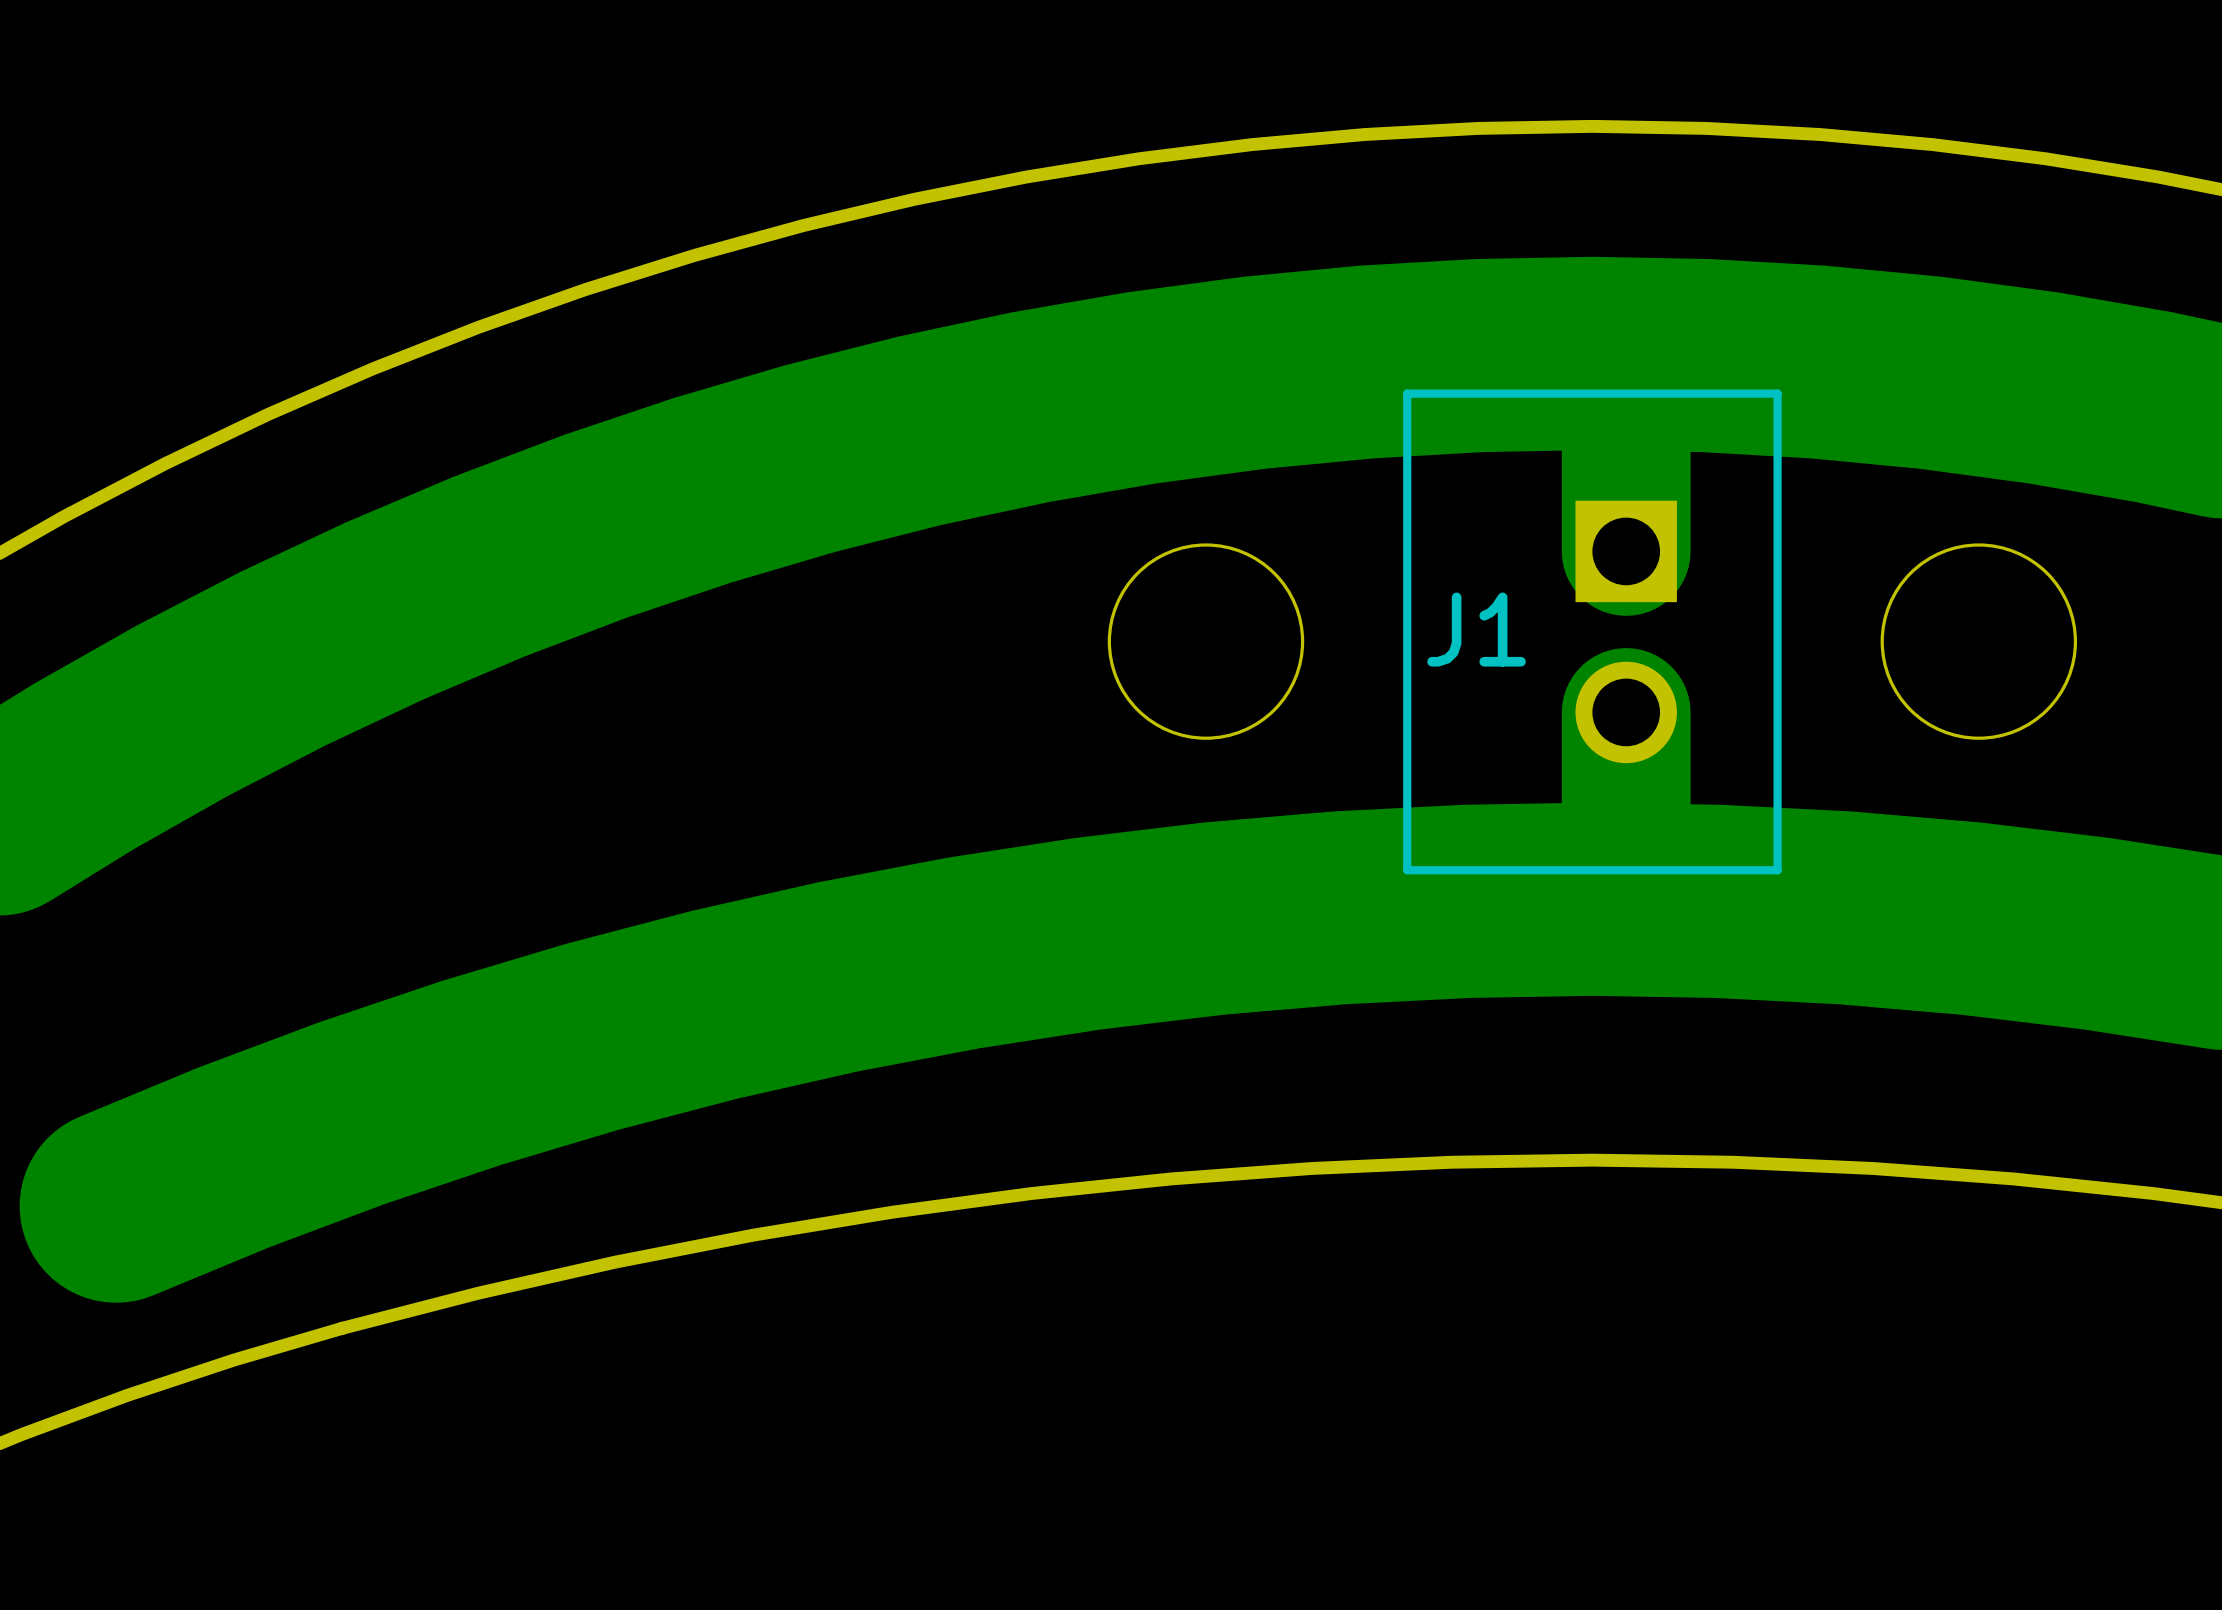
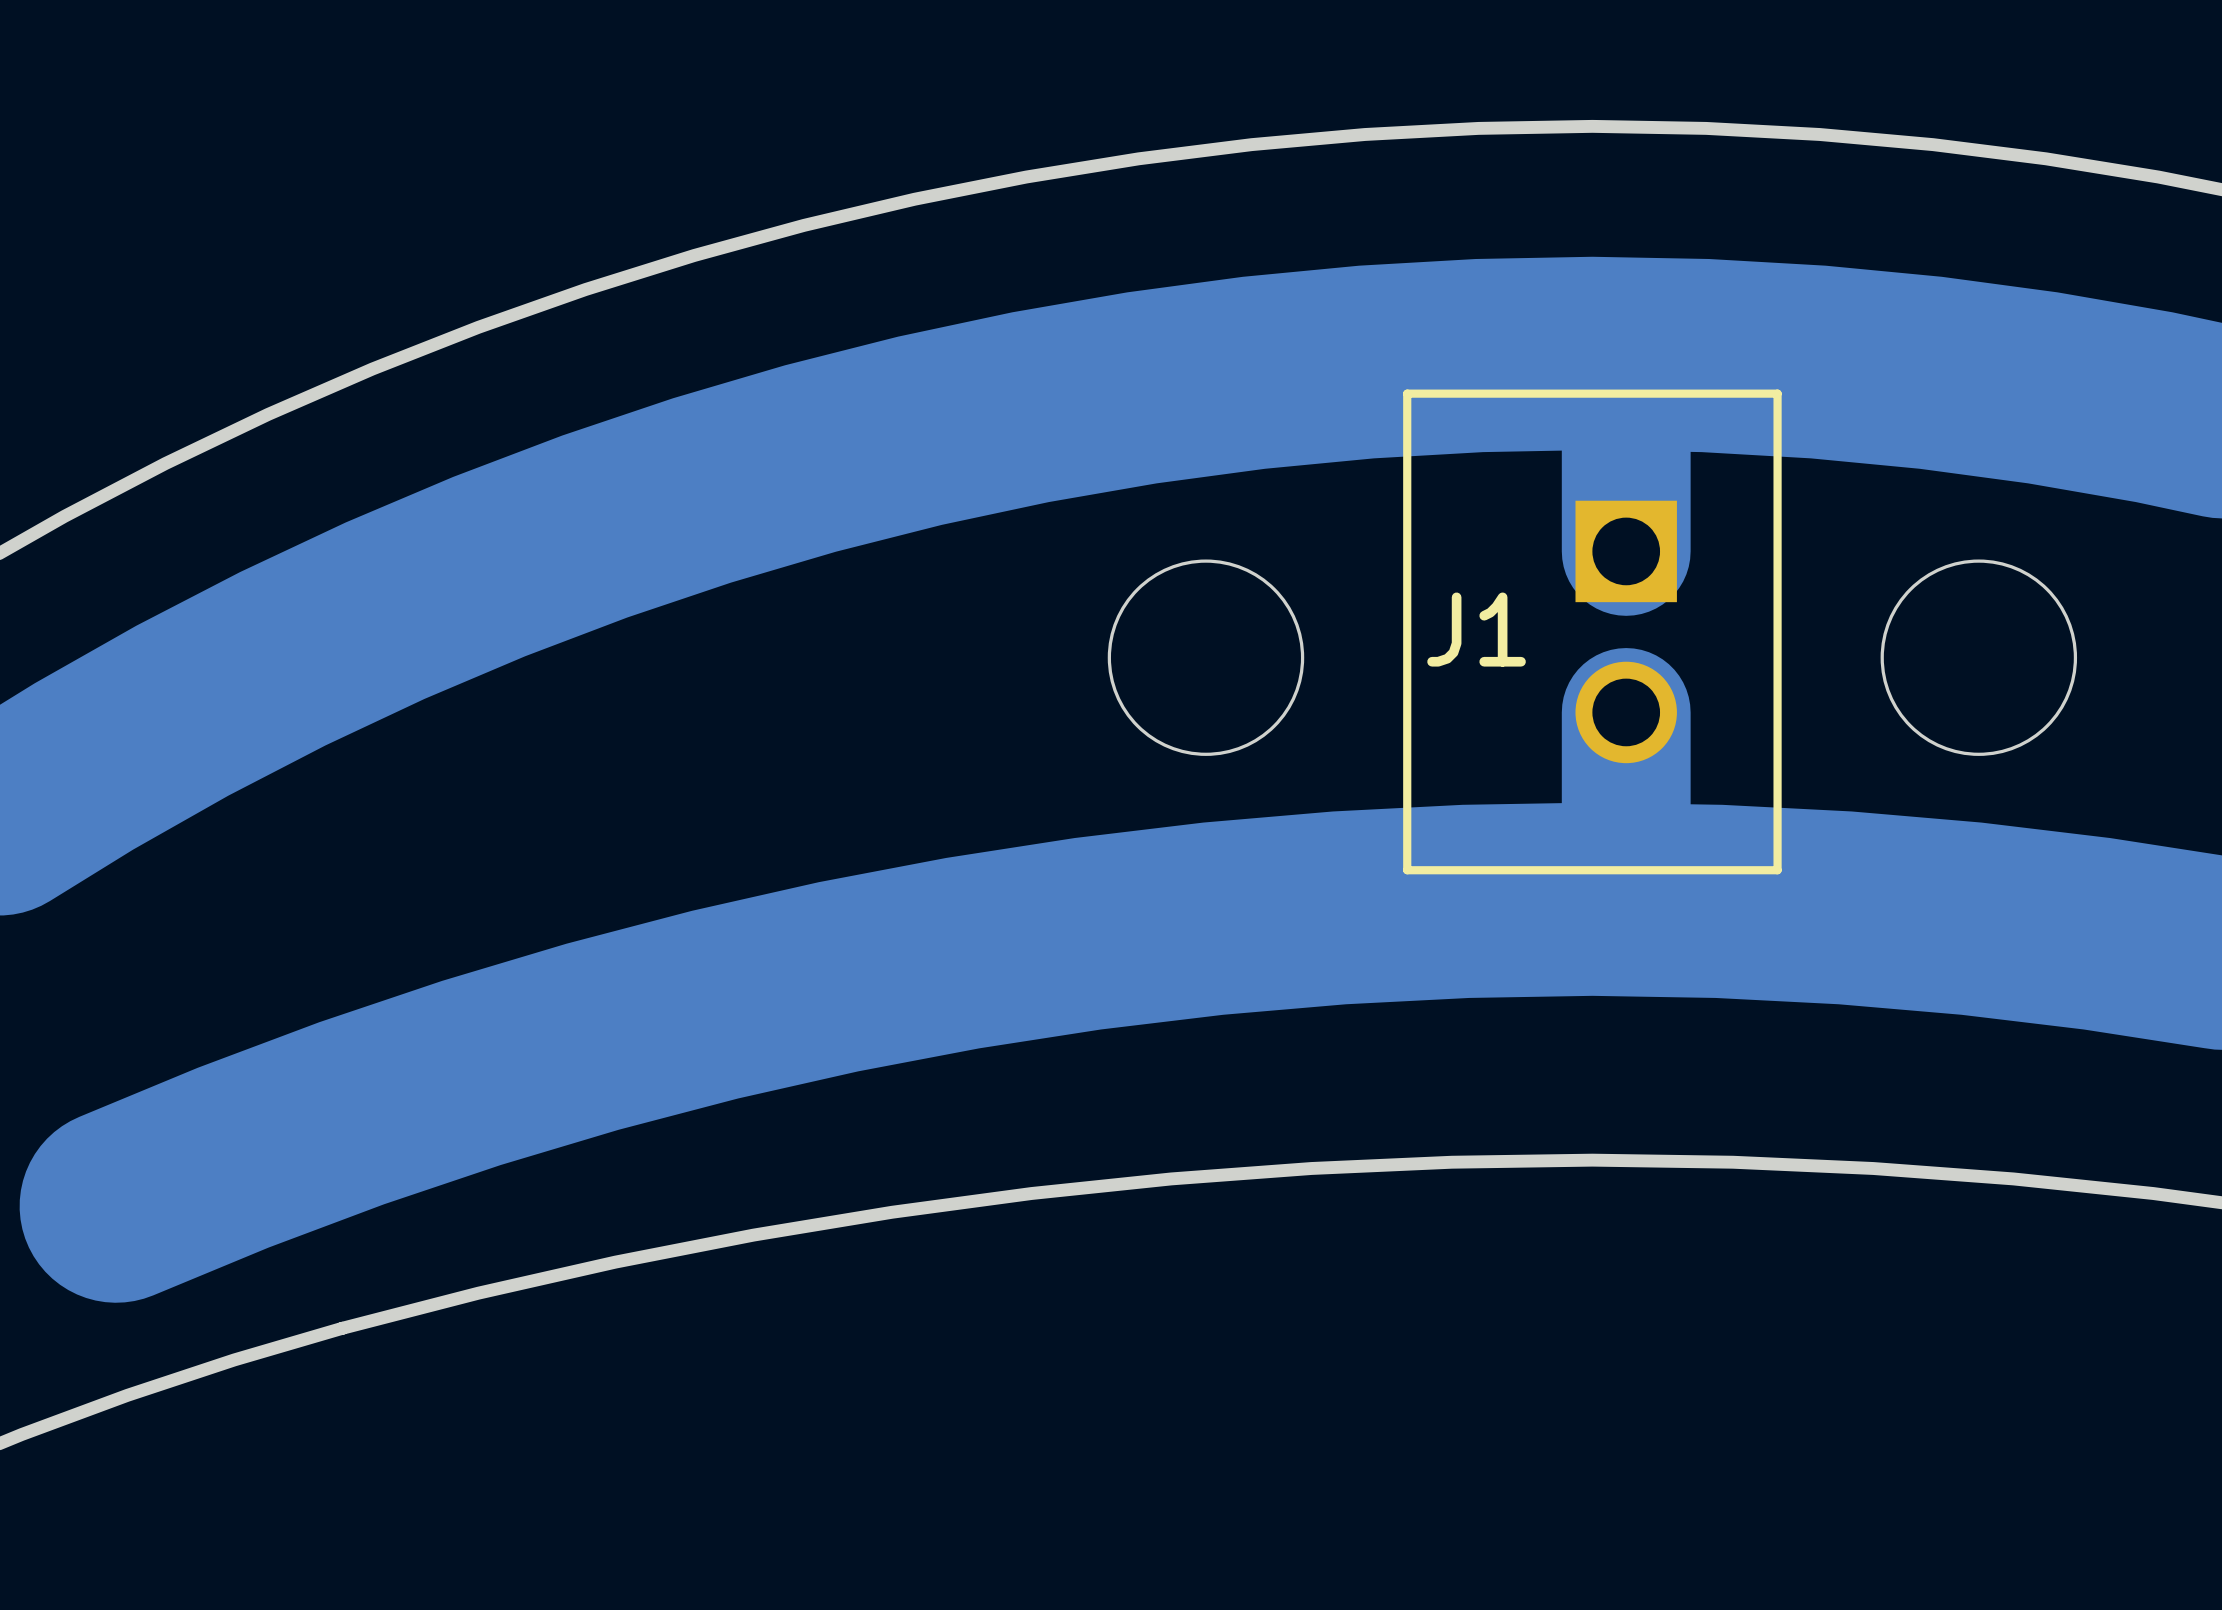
round board edge position: (1205, 641) -> (1205, 657)
round board edge position: (1978, 641) -> (1978, 657)

